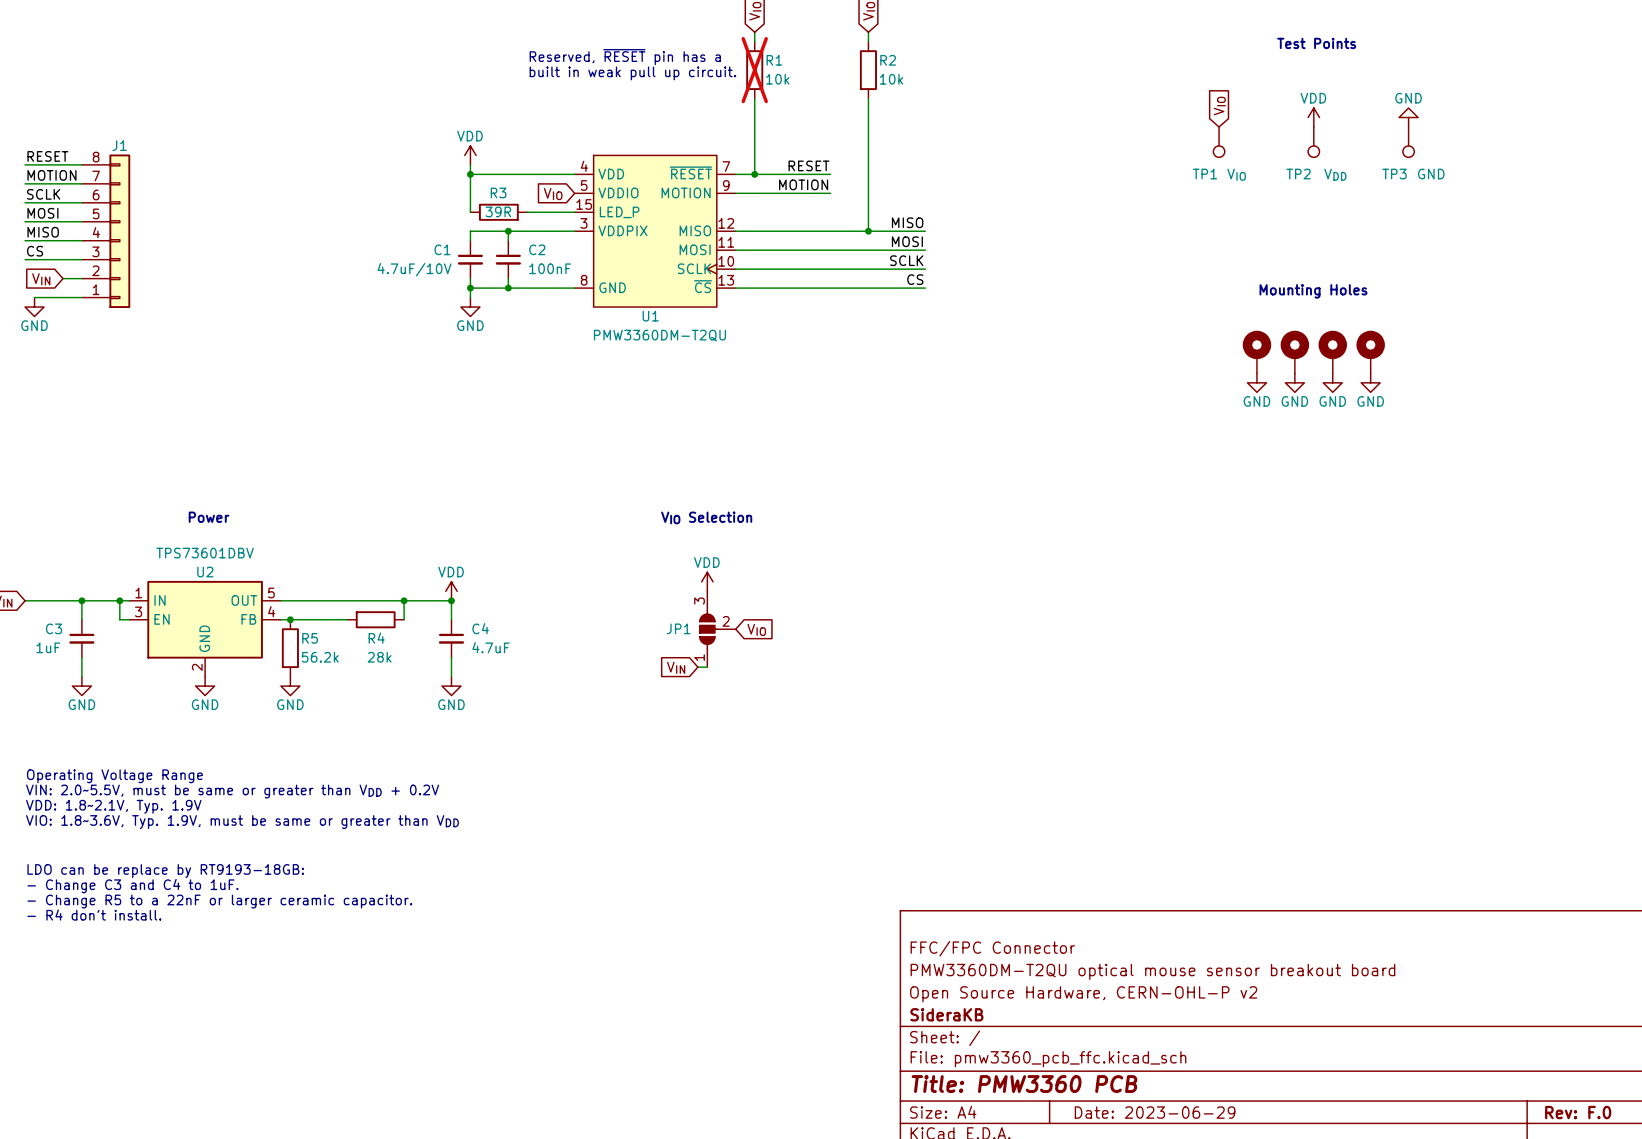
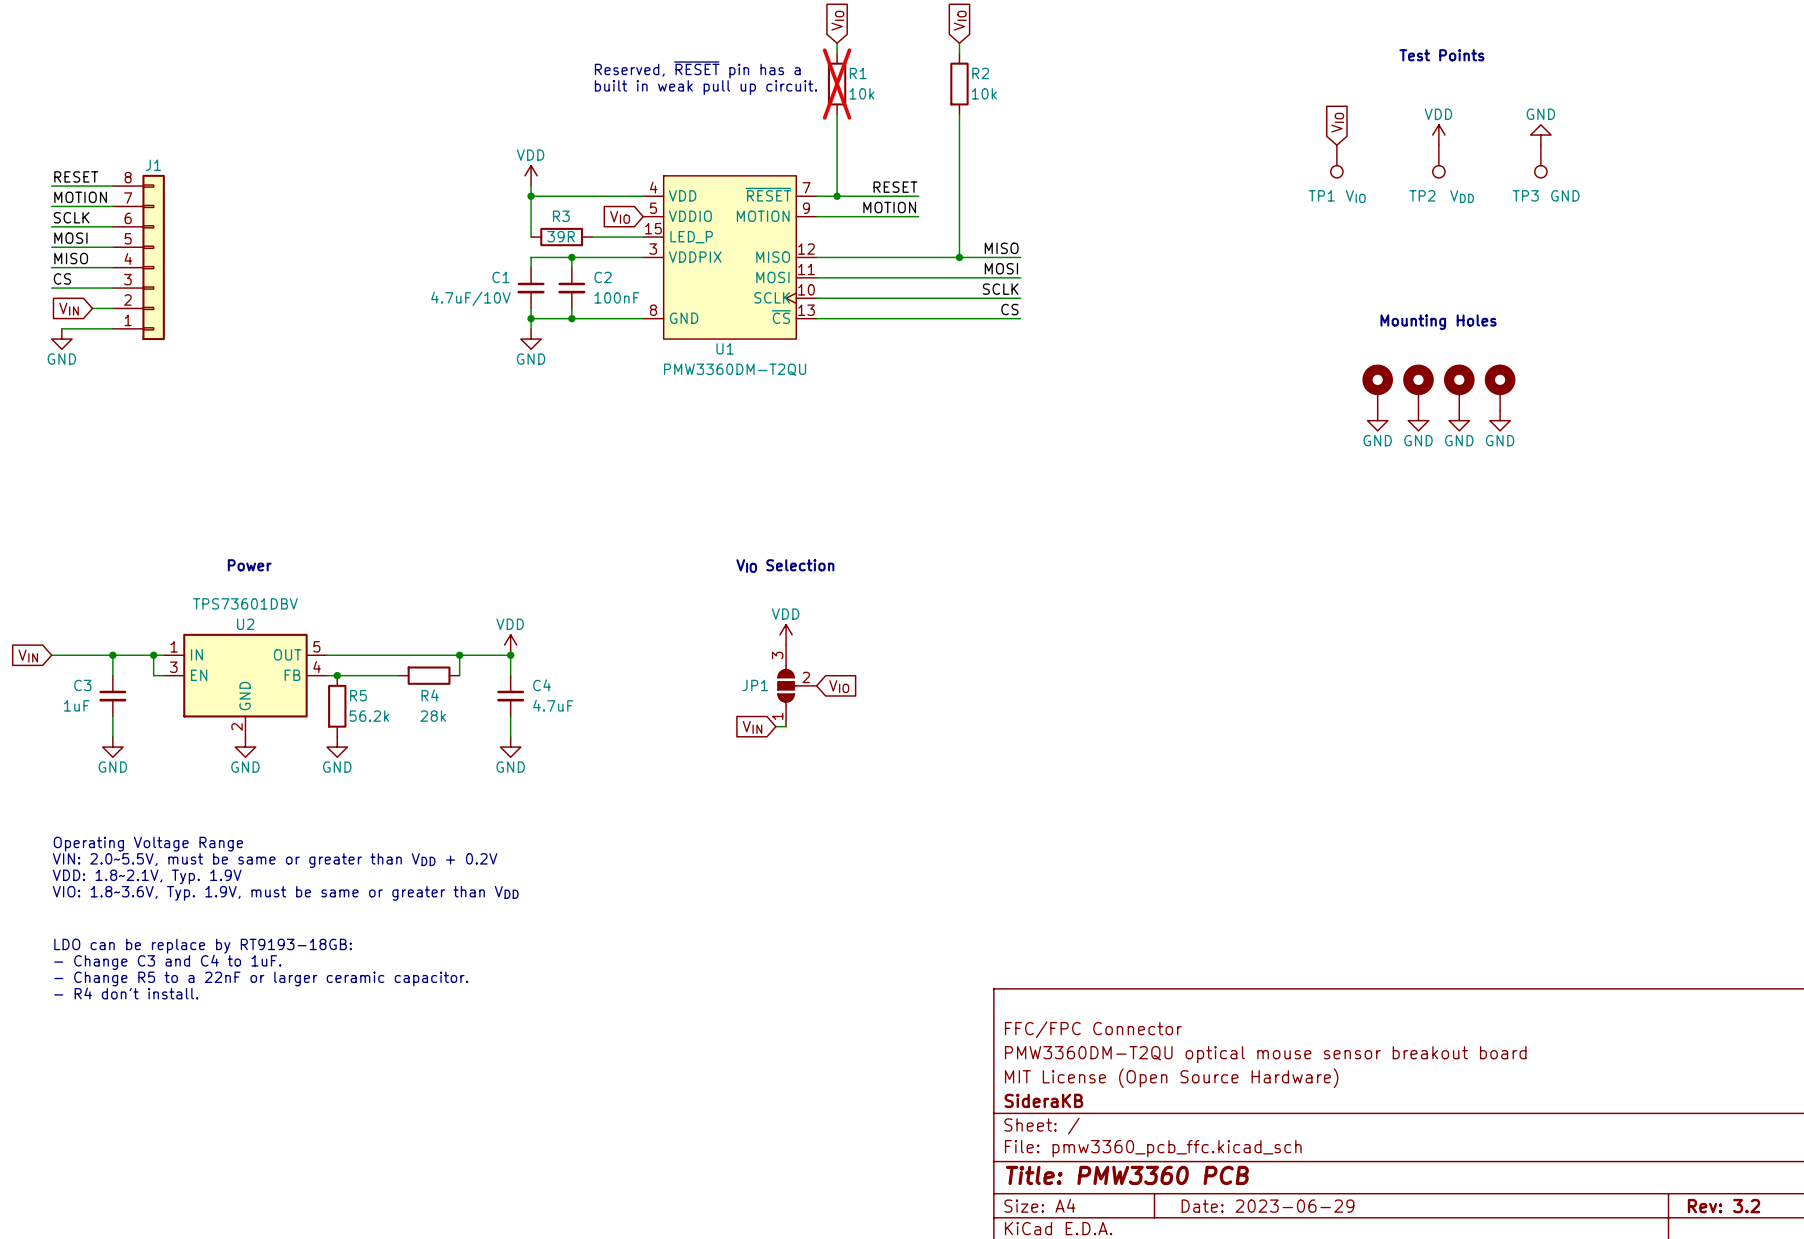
title block: Open Source Hardware, CERN-OHL-P v2 (1083, 994) -> MIT License (Open Source Hardware) (1171, 1078)
title block: Rev: F.0 (1578, 1112) -> Rev: 3.2 (1724, 1206)

